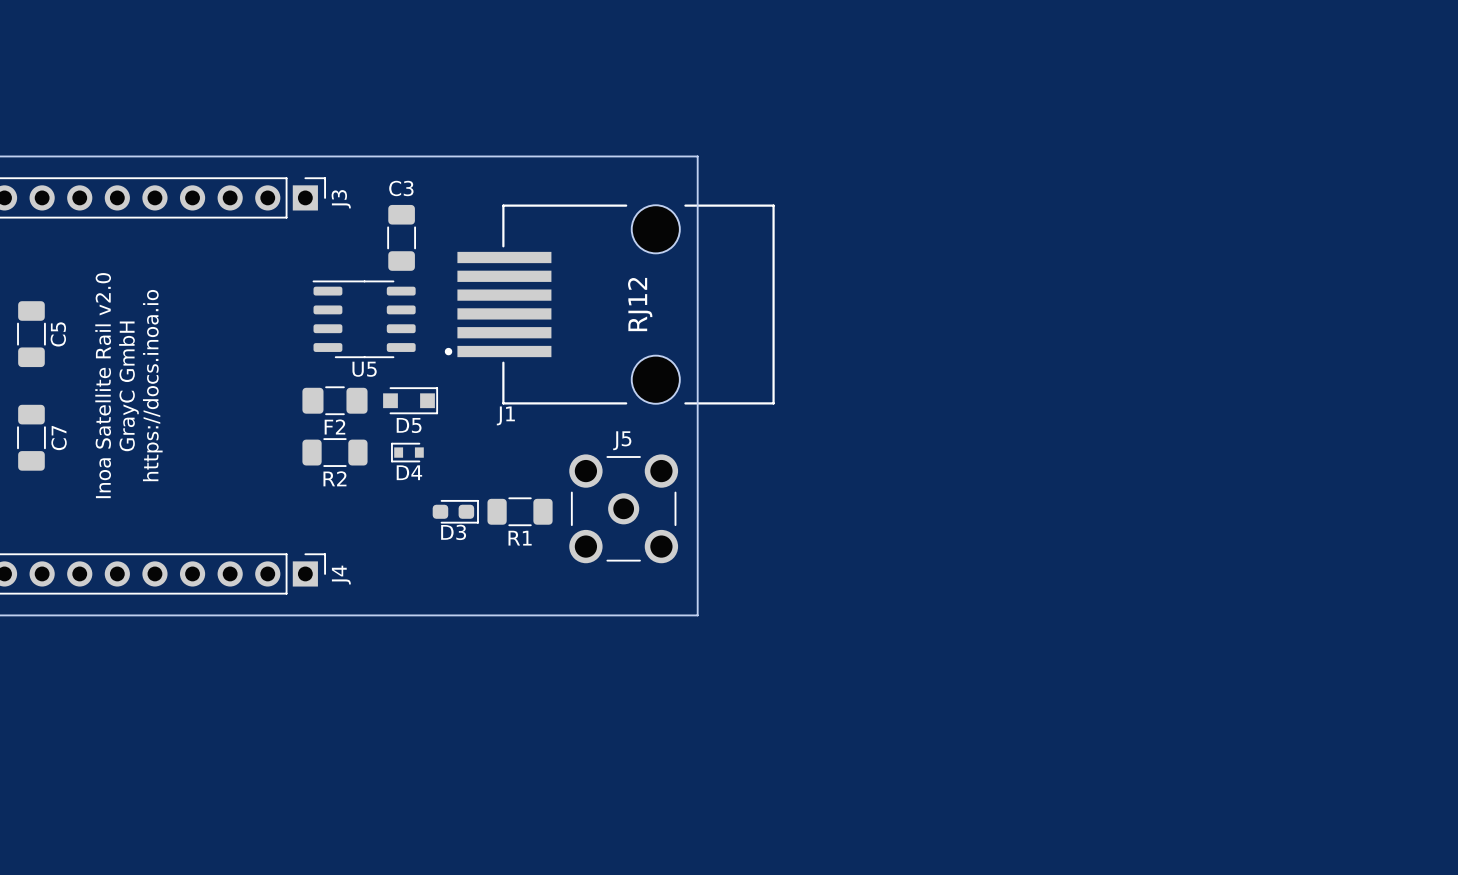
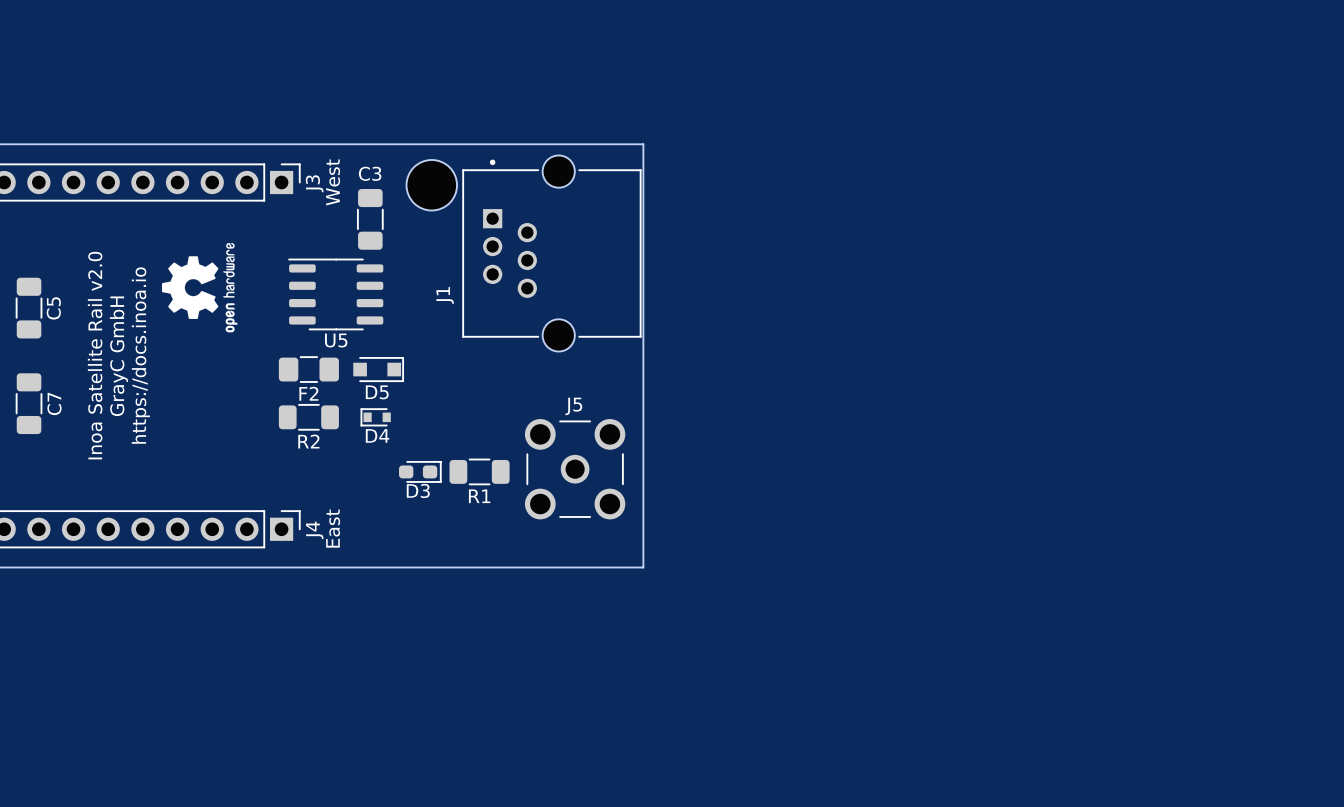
J3 value: none -> West (333, 182)
part: none -> (431, 185)
J1 footprint: [444, 204, 775, 405] -> [462, 155, 642, 352]
drawing: none -> [161, 242, 238, 333]
J1 value: RJ12 (640, 304) -> none
J1 name position: J1 (505, 415) -> J1 (445, 295)
J4 value: none -> East (333, 528)

